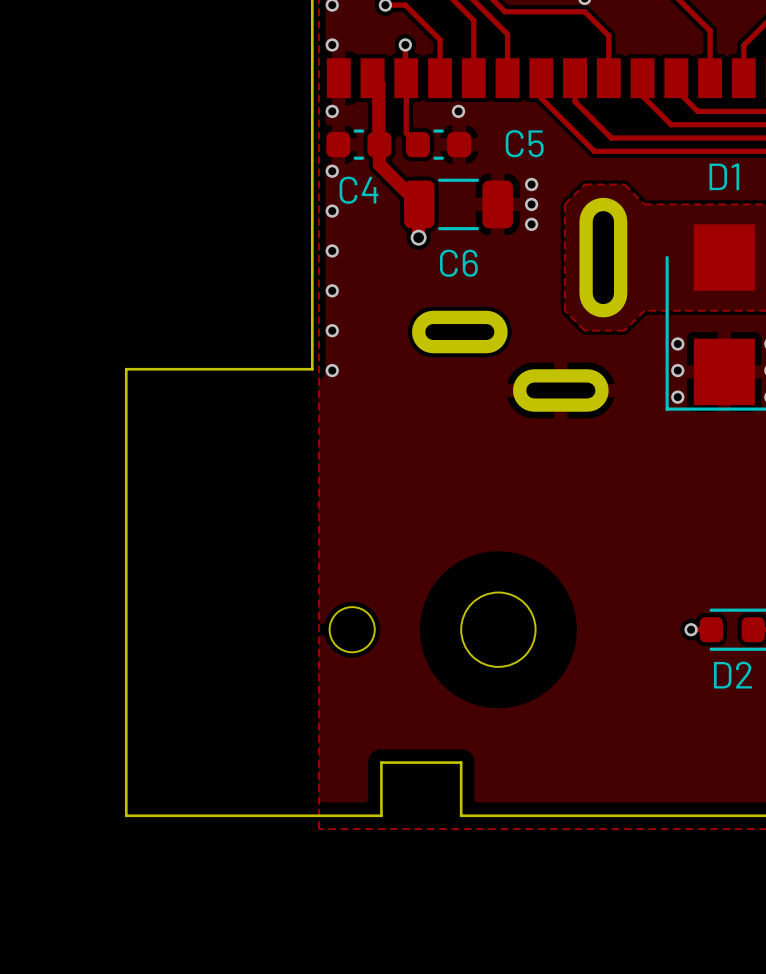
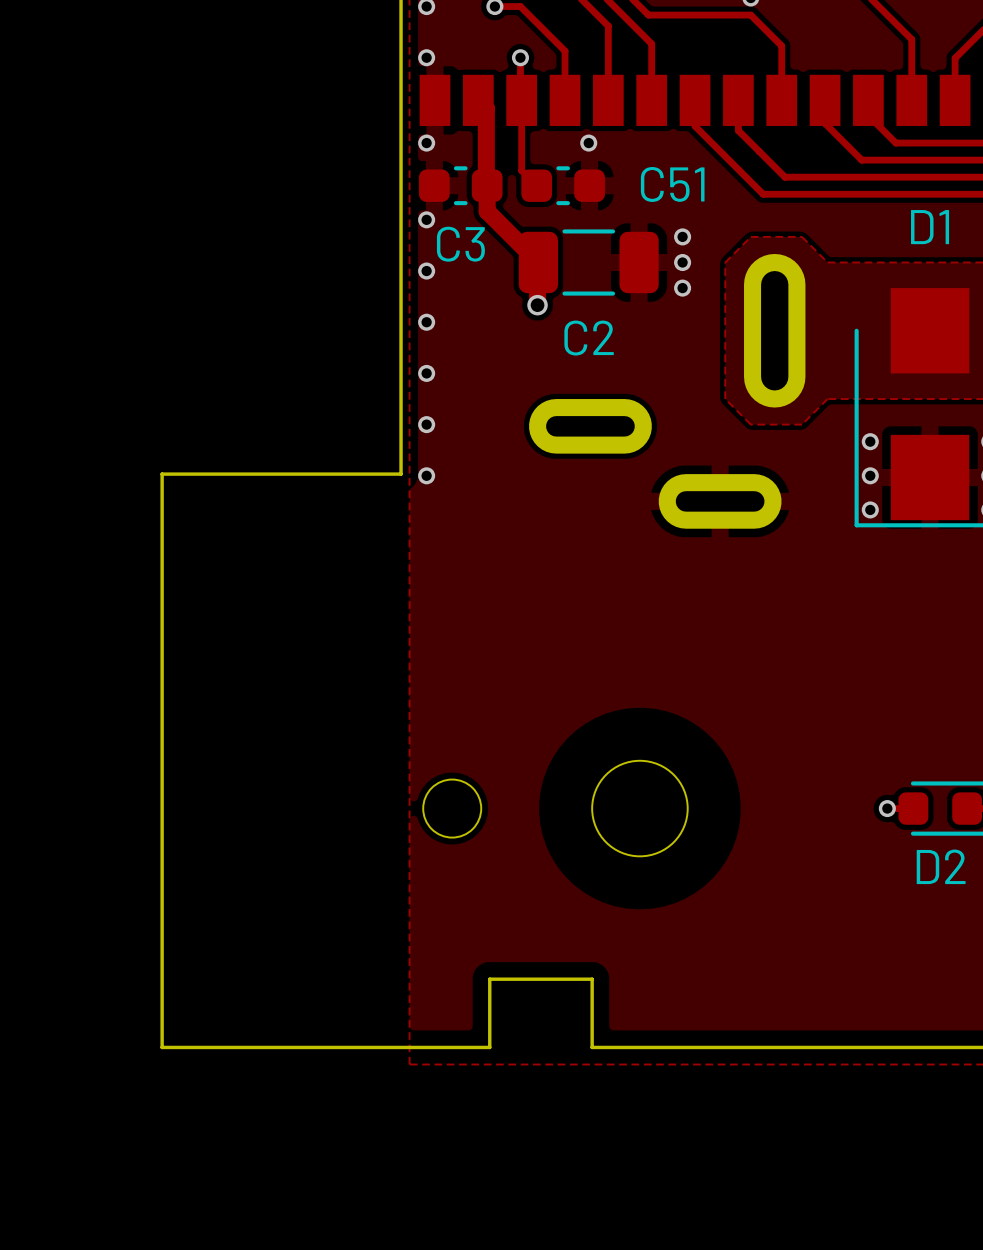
C5 name: C5 (524, 143) -> C51 (672, 184)
C4 name: C4 (359, 190) -> C3 (460, 244)
C6 name: C6 (458, 263) -> C2 (589, 338)

